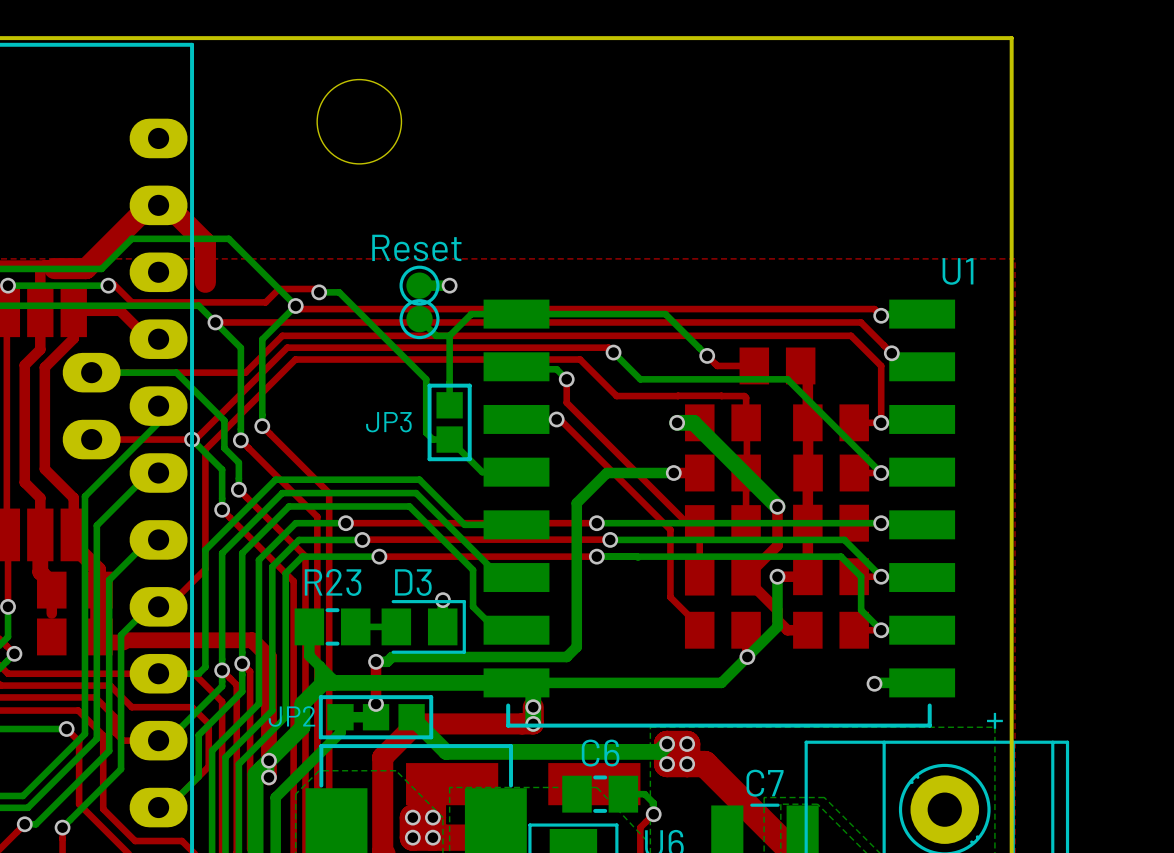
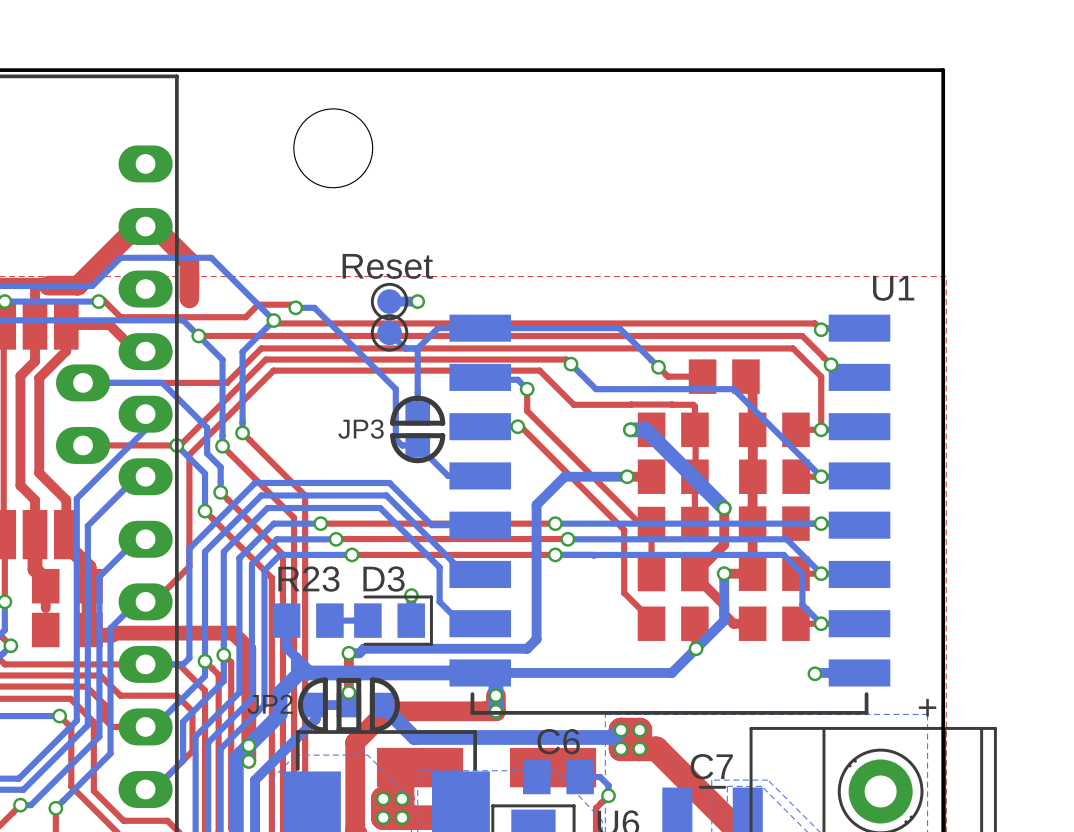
JP3 footprint: [427, 383, 472, 462] -> [390, 395, 446, 464]
R23 footprint: [294, 608, 371, 646] -> [272, 603, 344, 638]
JP2 footprint: [318, 695, 434, 740] -> [297, 677, 400, 733]
C6 footprint: [562, 775, 639, 813] -> [523, 759, 594, 795]

